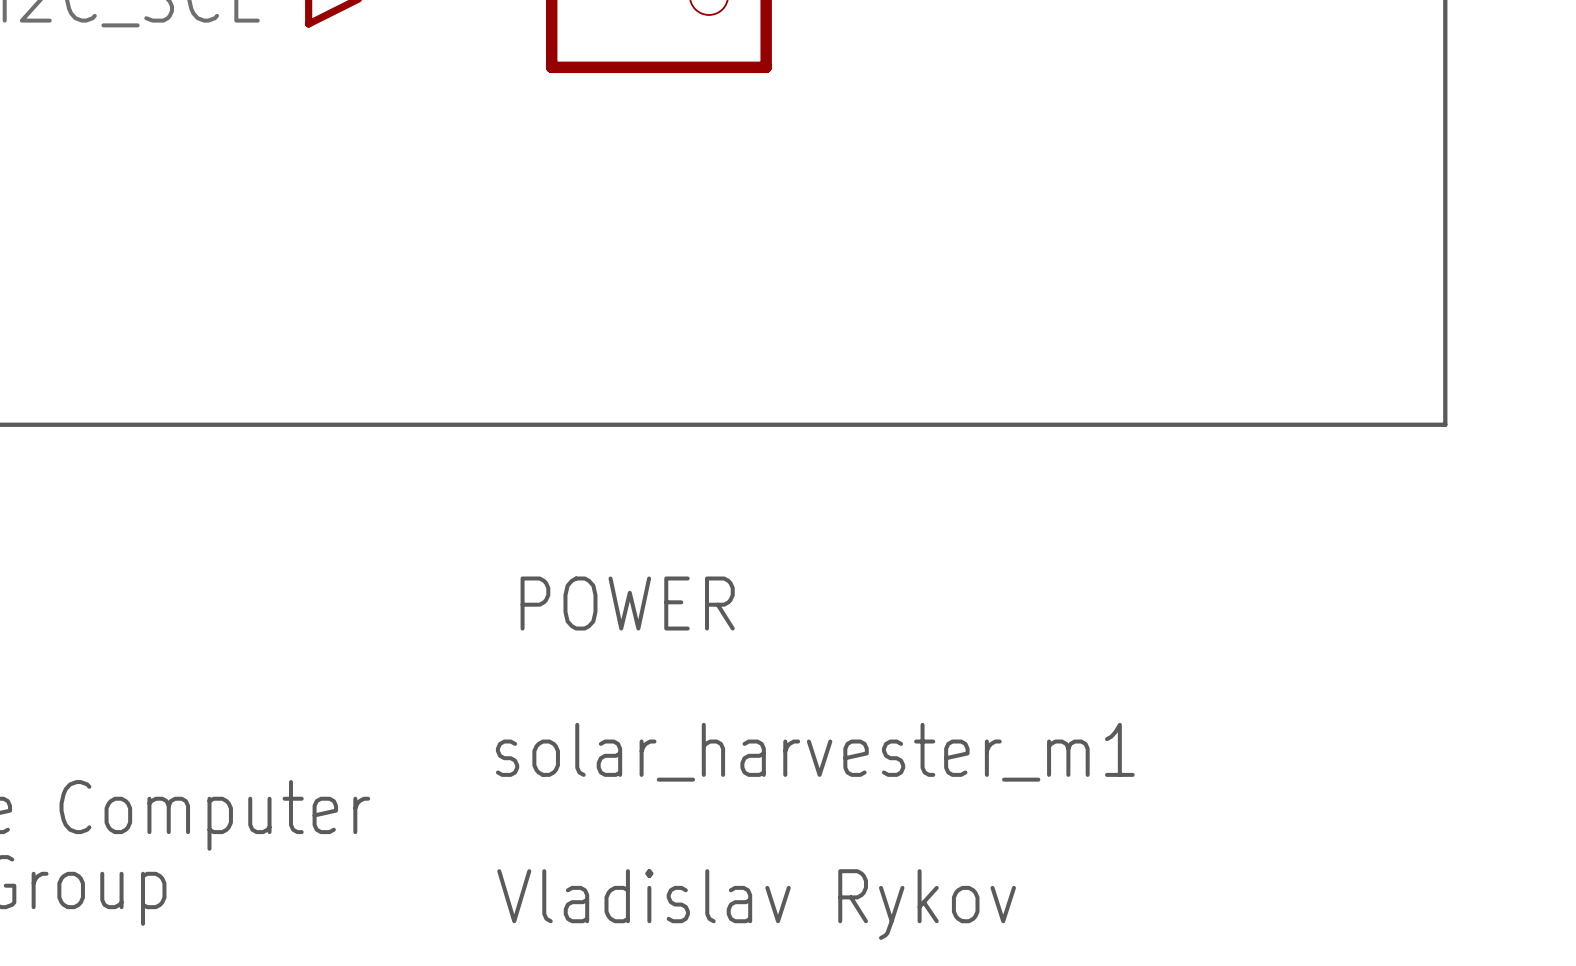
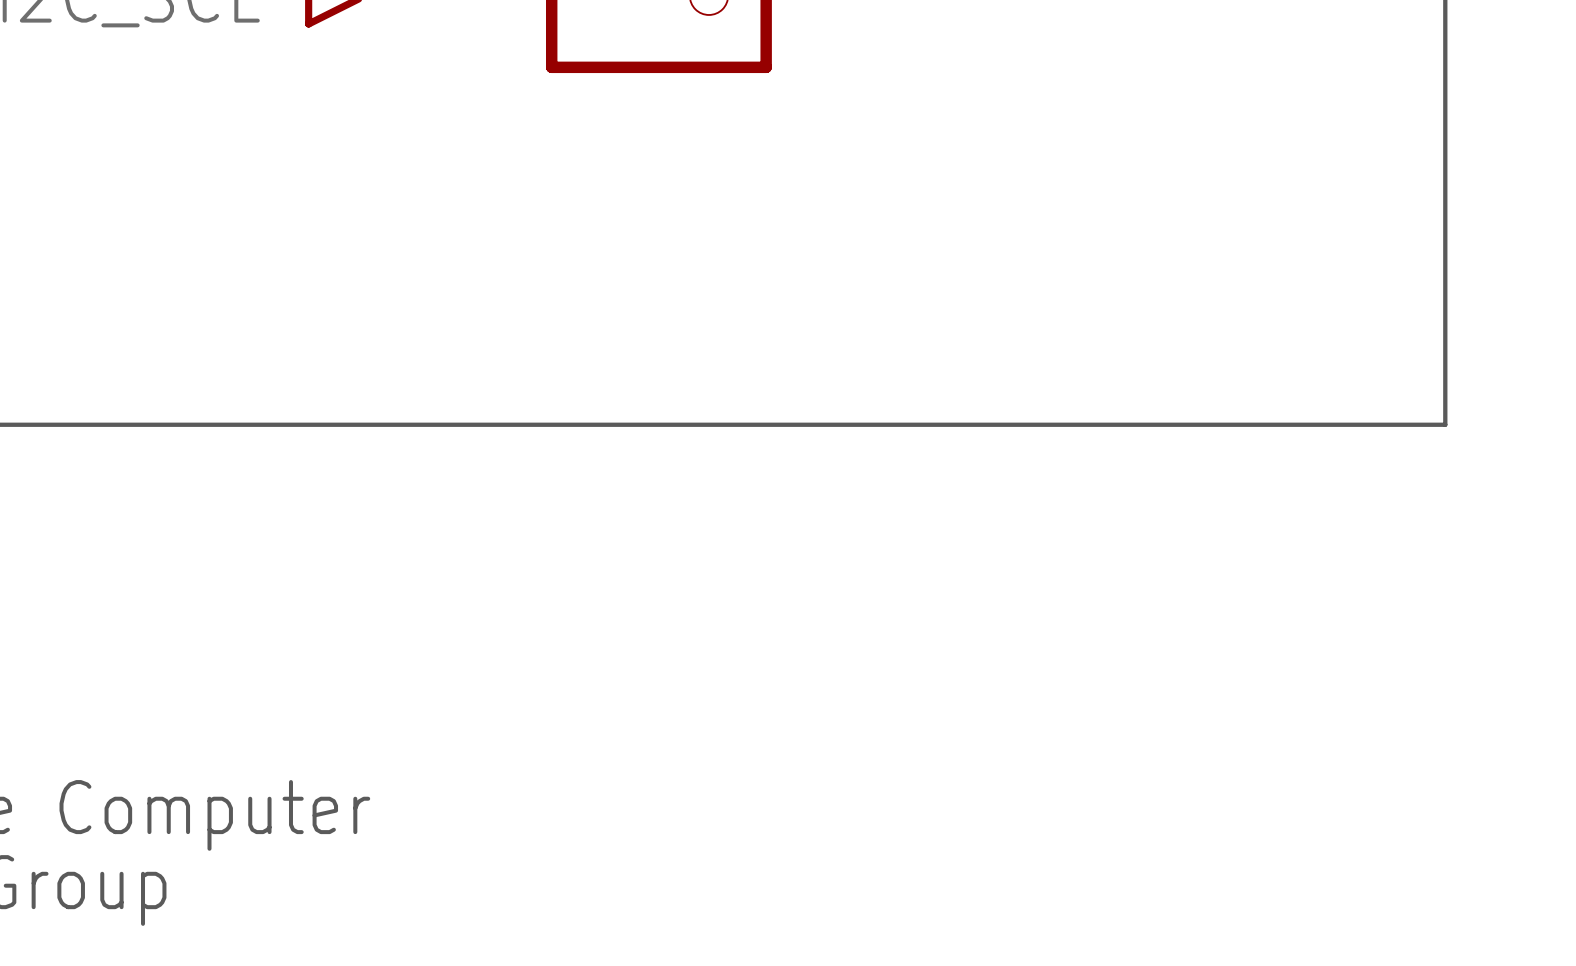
text: POWER (627, 603) -> none
text: solar_harvester_m1 (815, 752) -> none
text: Vladislav Rykov (756, 904) -> none

